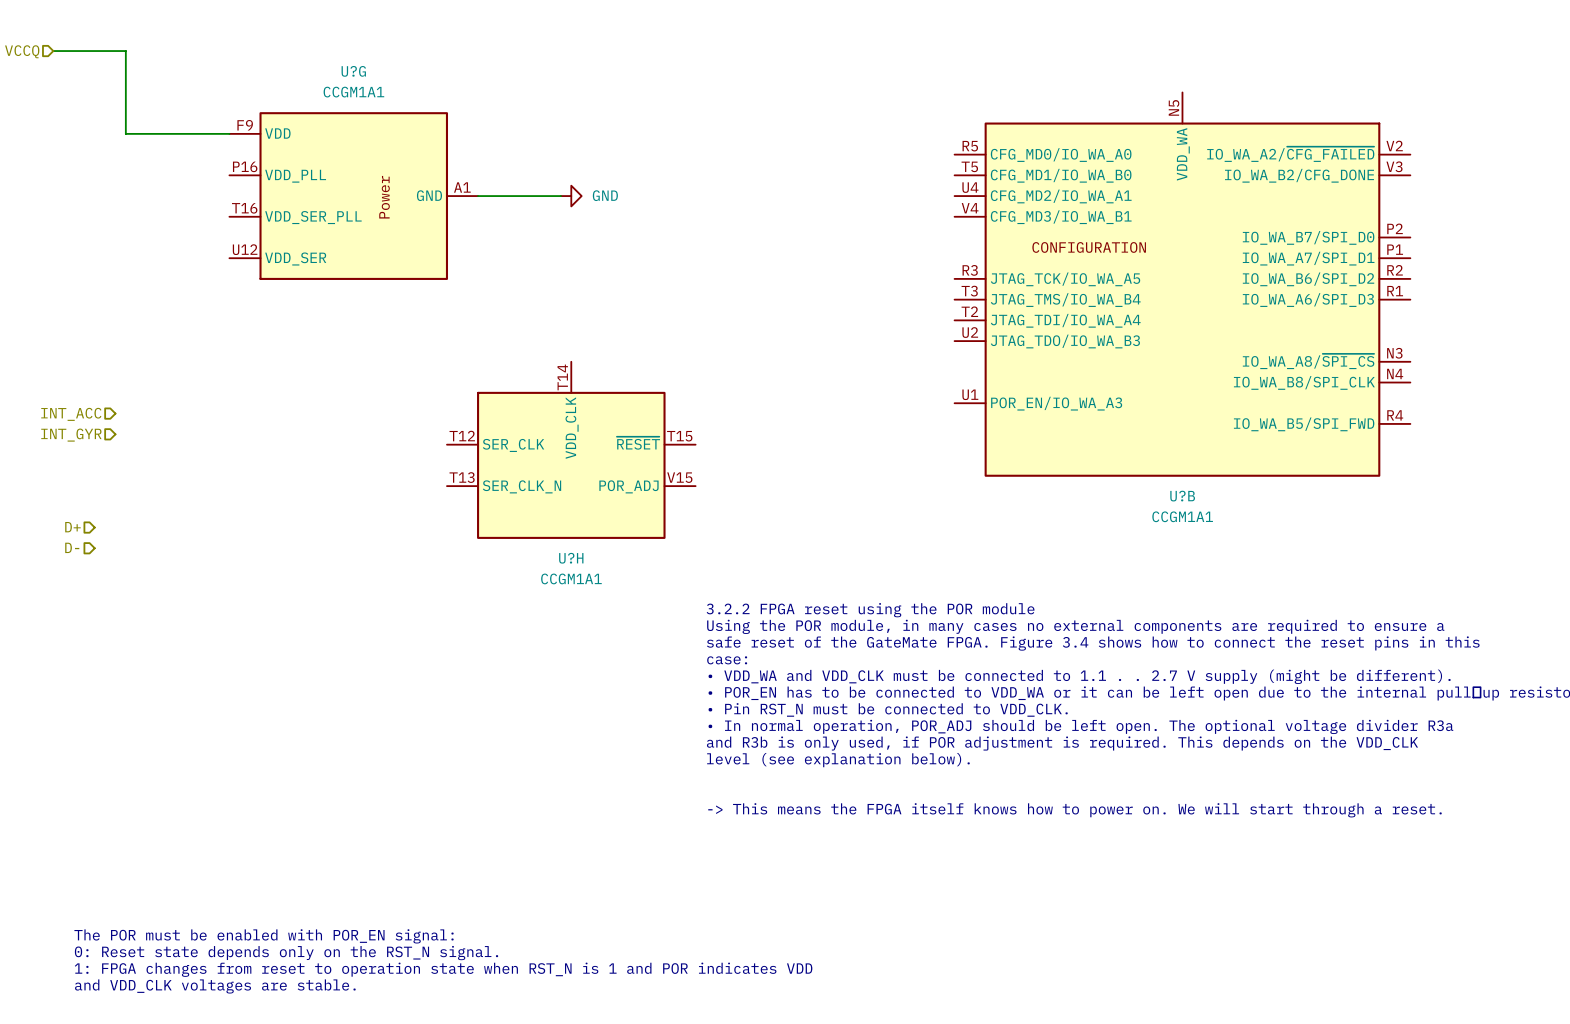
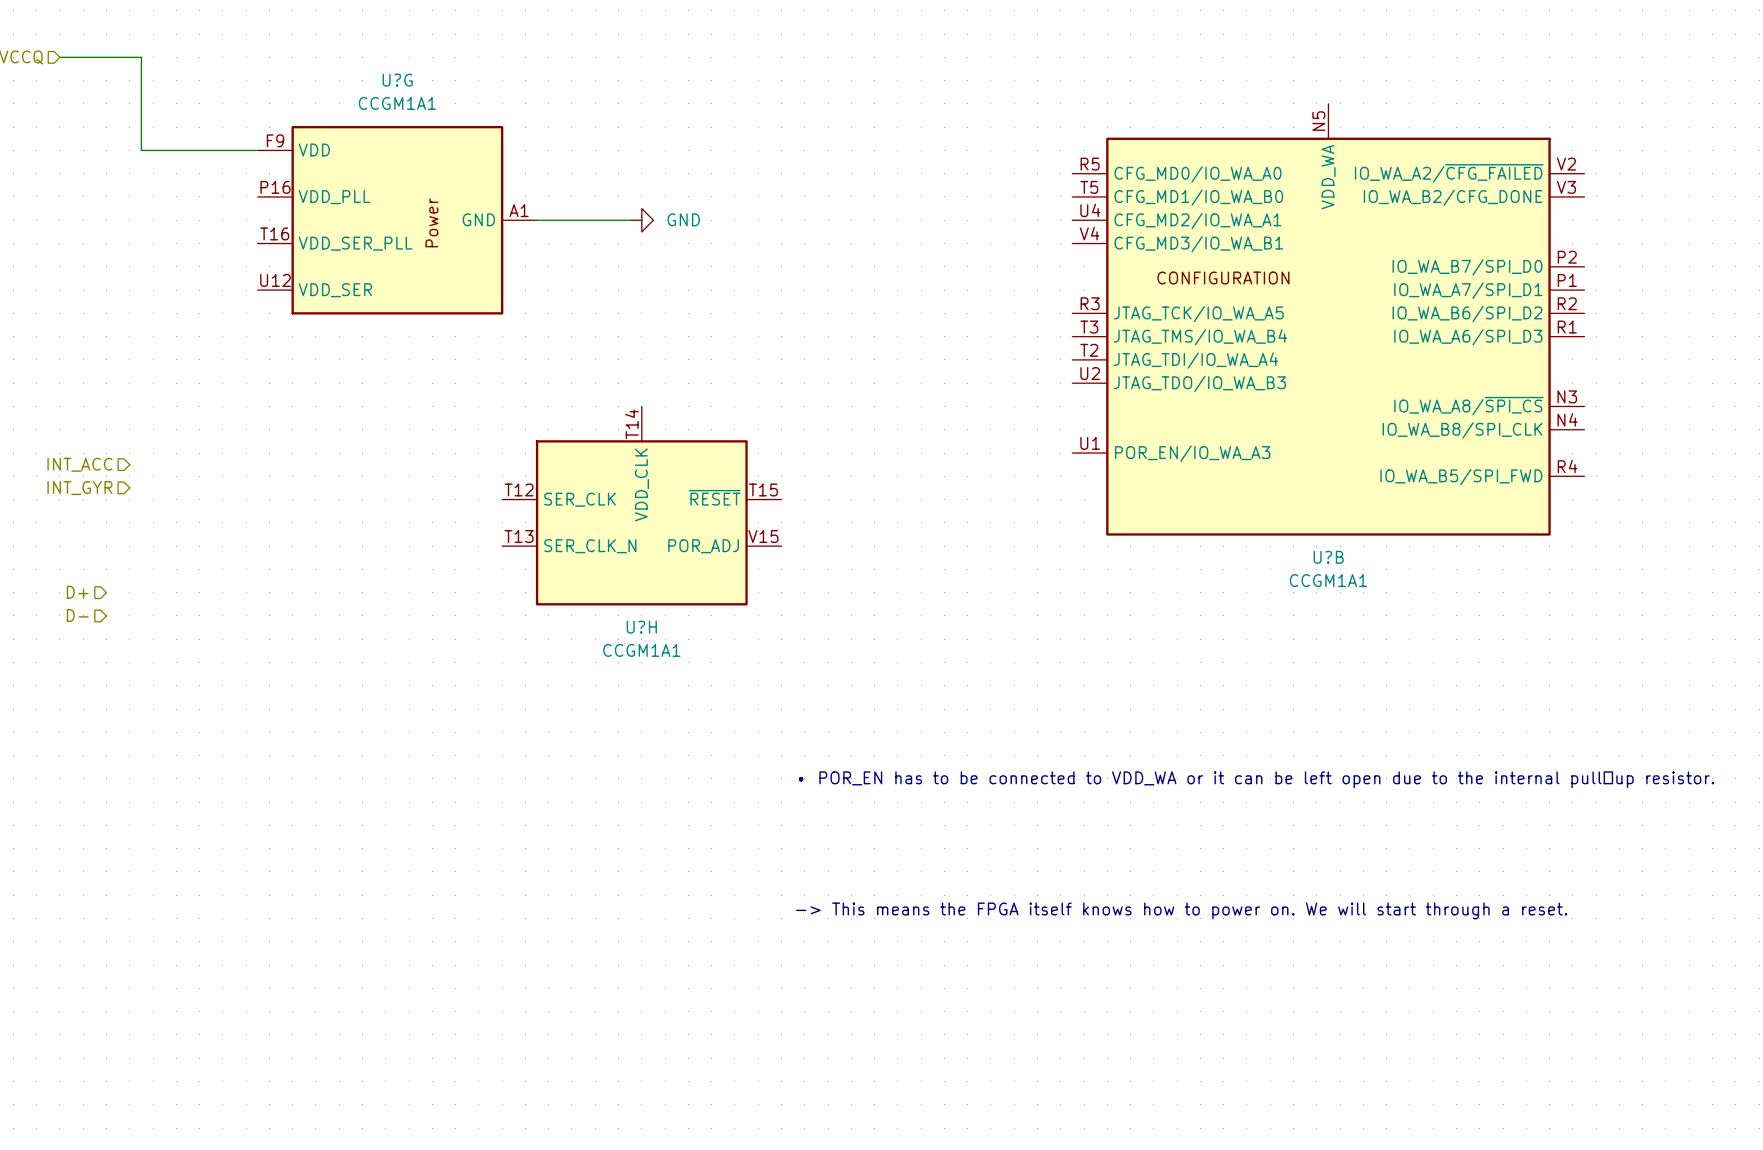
text: 3.2.2 FPGA reset using the POR module (870, 610) -> none
text: Using the POR module, in many cases no external components are required to ensure a (1075, 626) -> none
text: safe reset of the GateMate FPGA. Figure 3.4 shows how to connect the reset pins in this (1093, 643) -> none
text: case: (727, 660) -> none
text: • VDD_WA and VDD_CLK must be connected to 1.1 . . 2.7 V supply (might be different). (1079, 676) -> none
text: • Pin RST_N must be connected to VDD_CLK. (888, 709) -> none
text: • In normal operation, POR_ADJ should be left open. The optional voltage divider R3a (1080, 726) -> none
text: and R3b is only used, if POR adjustment is required. This depends on the VDD_CLK (1062, 743) -> none
text: level (see explanation below). (838, 760) -> none
text: The POR must be enabled with POR_EN signal: (264, 936) -> none
text: 0: Reset state depends only on the RST_N signal. (286, 953) -> none
text: 1: FPGA changes from reset to operation state when RST_N is 1 and POR indicates VDD (443, 969) -> none
text: and VDD_CLK voltages are stable. (215, 986) -> none

